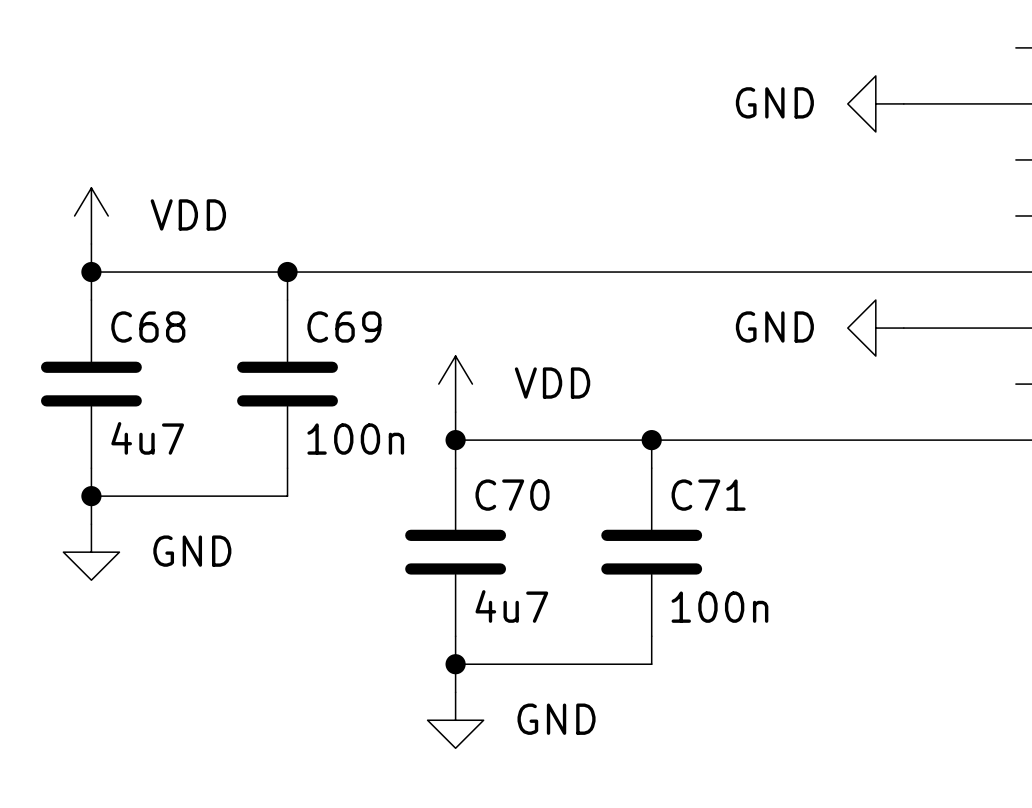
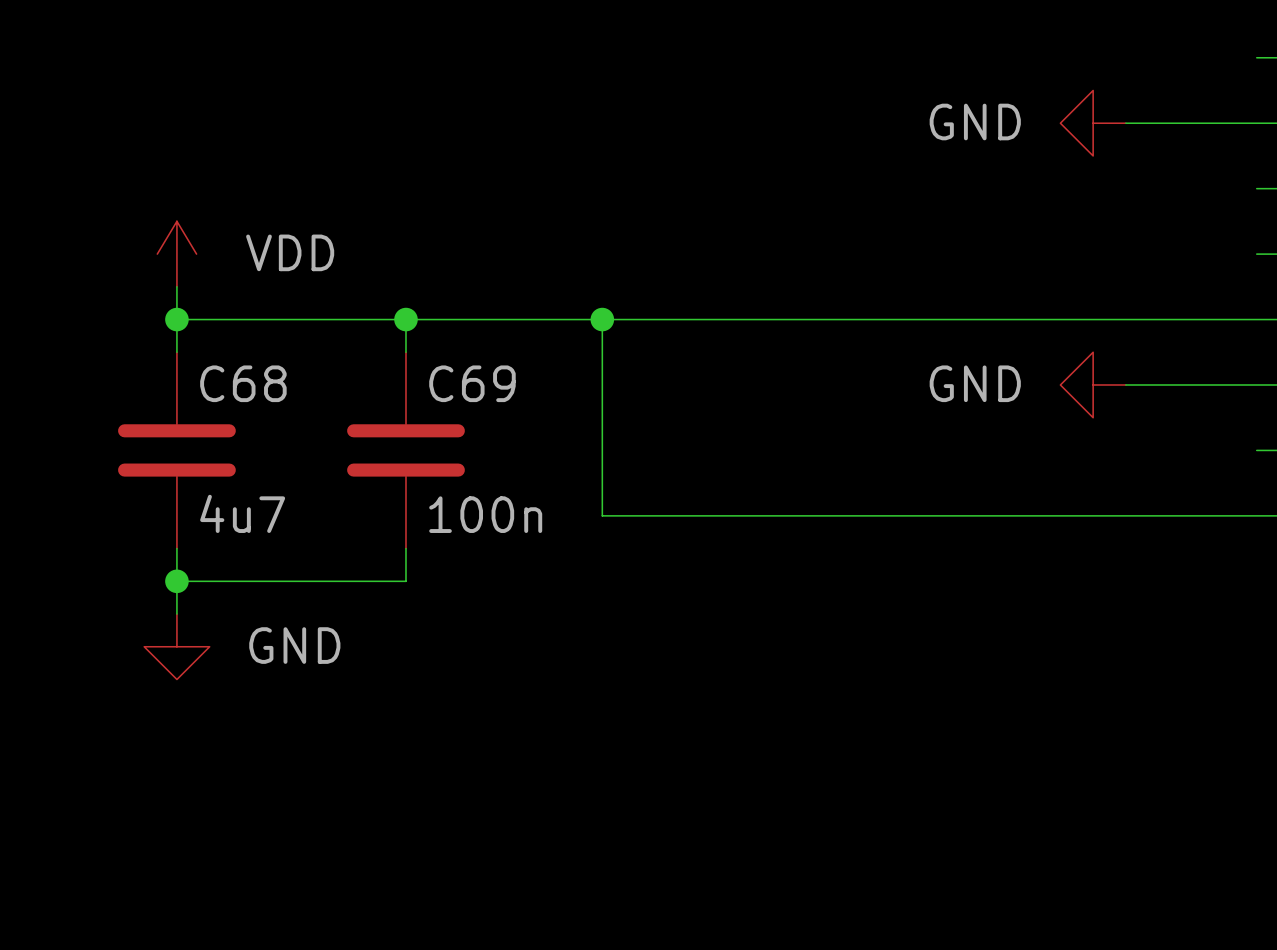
wire: none -> (602, 319) (602, 483)
junction: none -> (602, 319)
power symbol: VDD (455, 384) -> none
wire: (455, 440) (455, 468) -> none
junction: (455, 440) -> none
wire: (651, 440) (651, 468) -> none
junction: (651, 440) -> none
C70: 4u7 (455, 552) -> none
C71: 100n (651, 552) -> none
wire: (455, 636) (455, 692) -> none
wire: (651, 636) (651, 664) (455, 664) -> none
junction: (455, 664) -> none
power symbol: GND (455, 720) -> none

